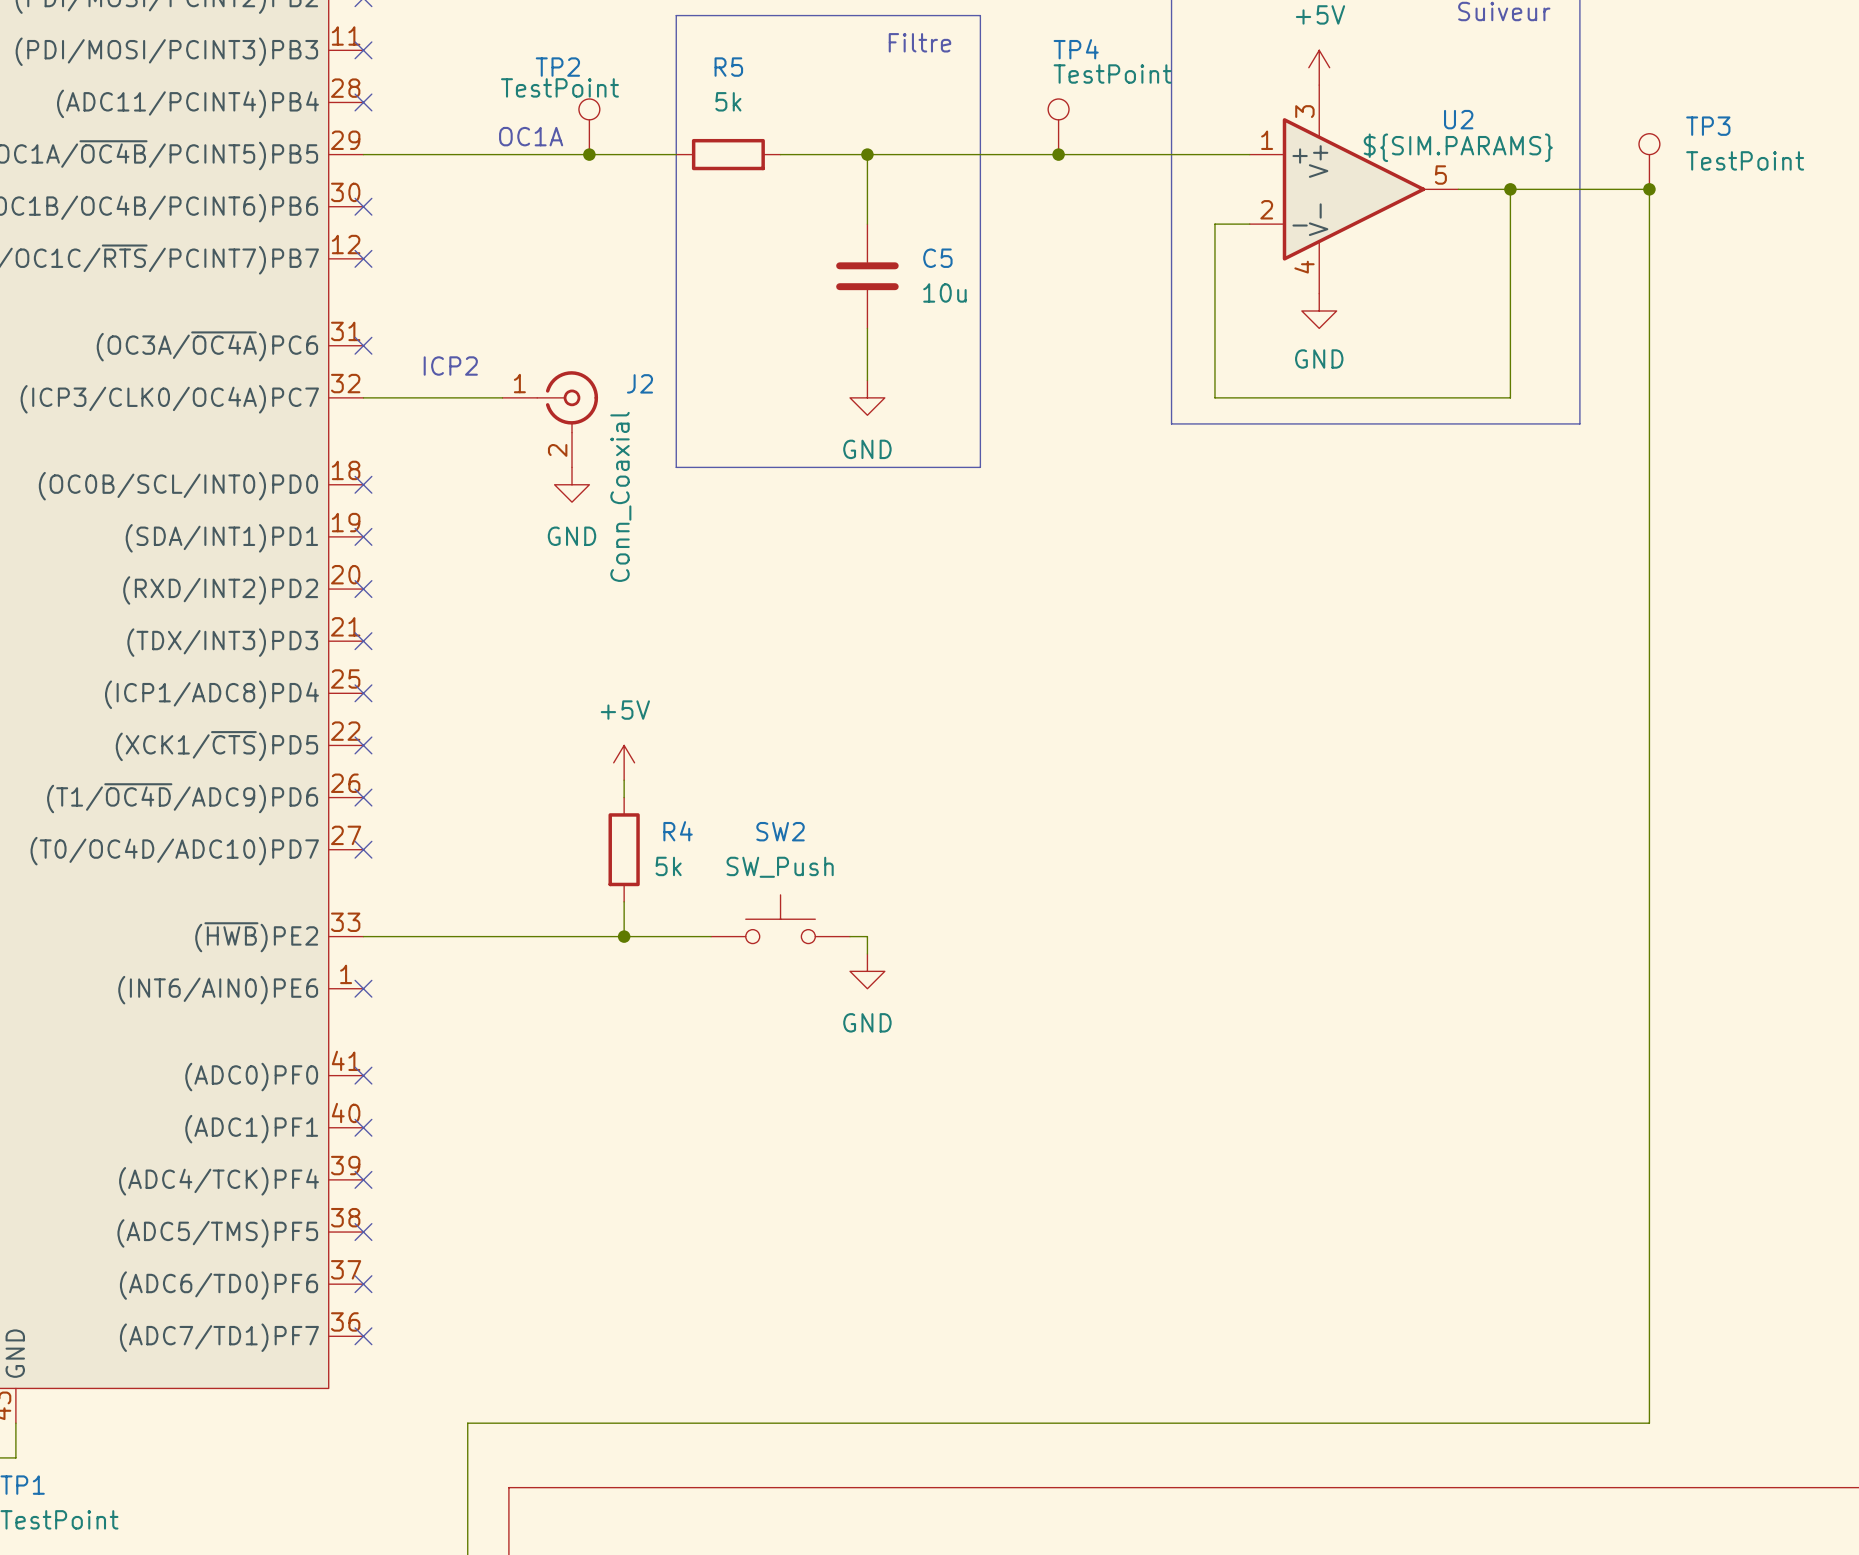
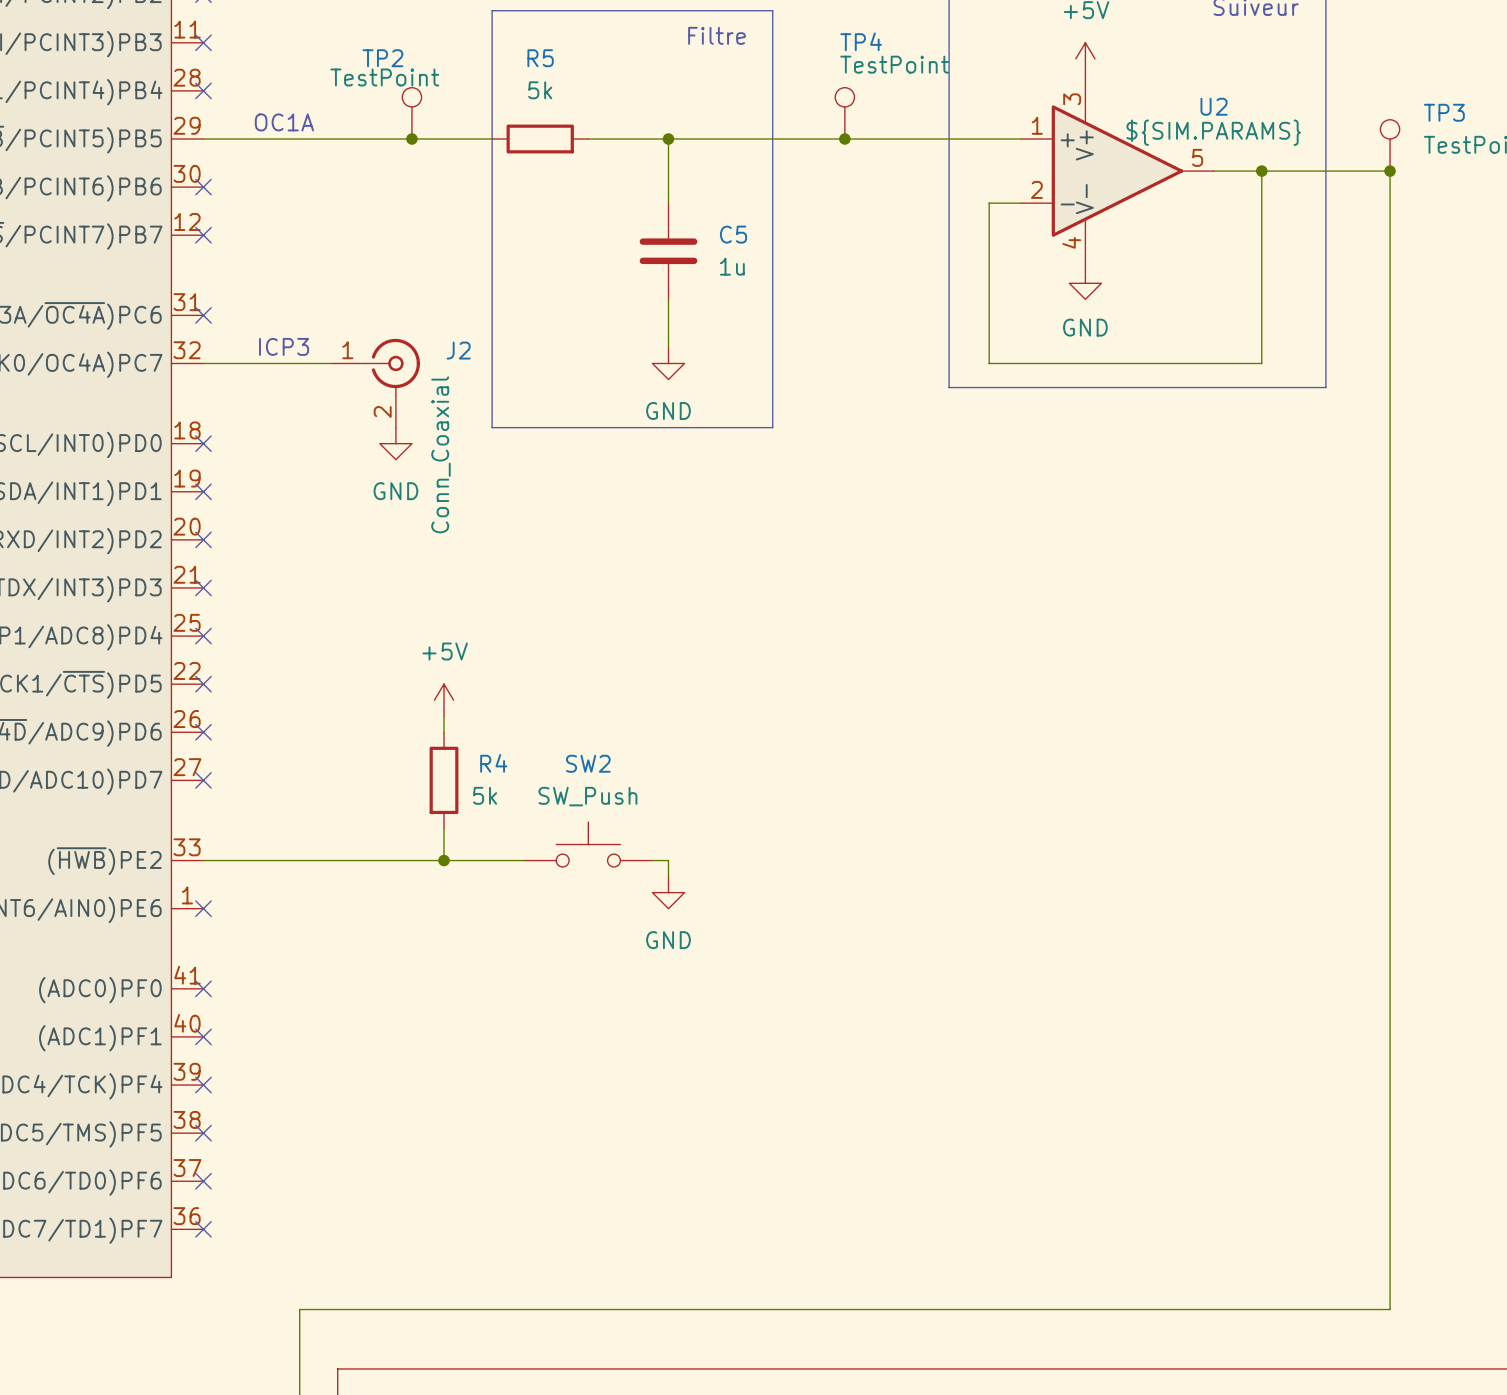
text position: OC1A (531, 136) -> OC1A (284, 122)
C5 value: 10u (944, 292) -> 1u (732, 266)
text: ICP2 (450, 366) -> ICP3 (284, 346)

